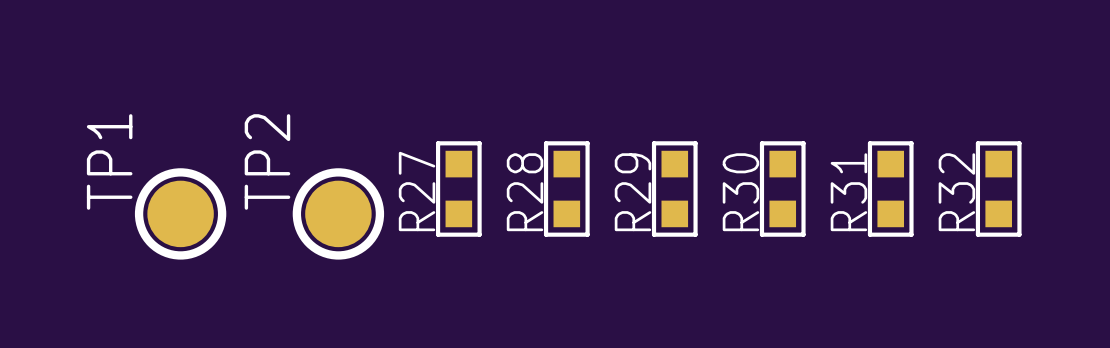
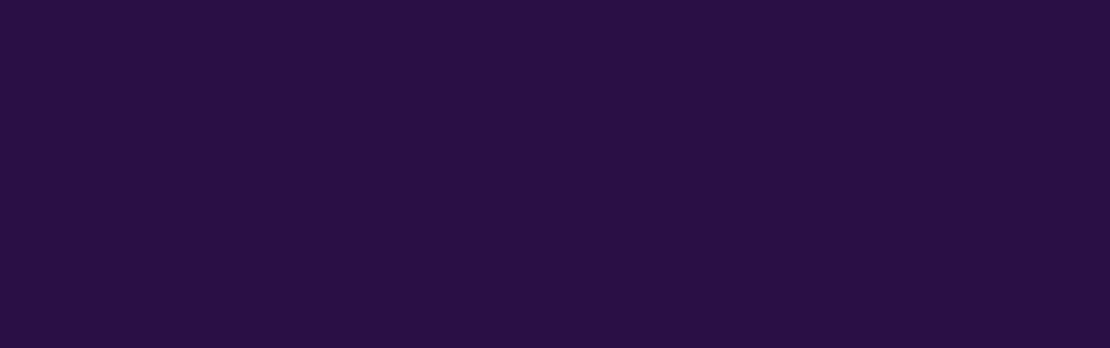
R27: (458, 189) -> none
R28: (566, 189) -> none
R29: (674, 189) -> none
R30: (782, 189) -> none
R31: (890, 189) -> none
R32: (998, 189) -> none
TP1: (180, 213) -> none
TP2: (338, 213) -> none

